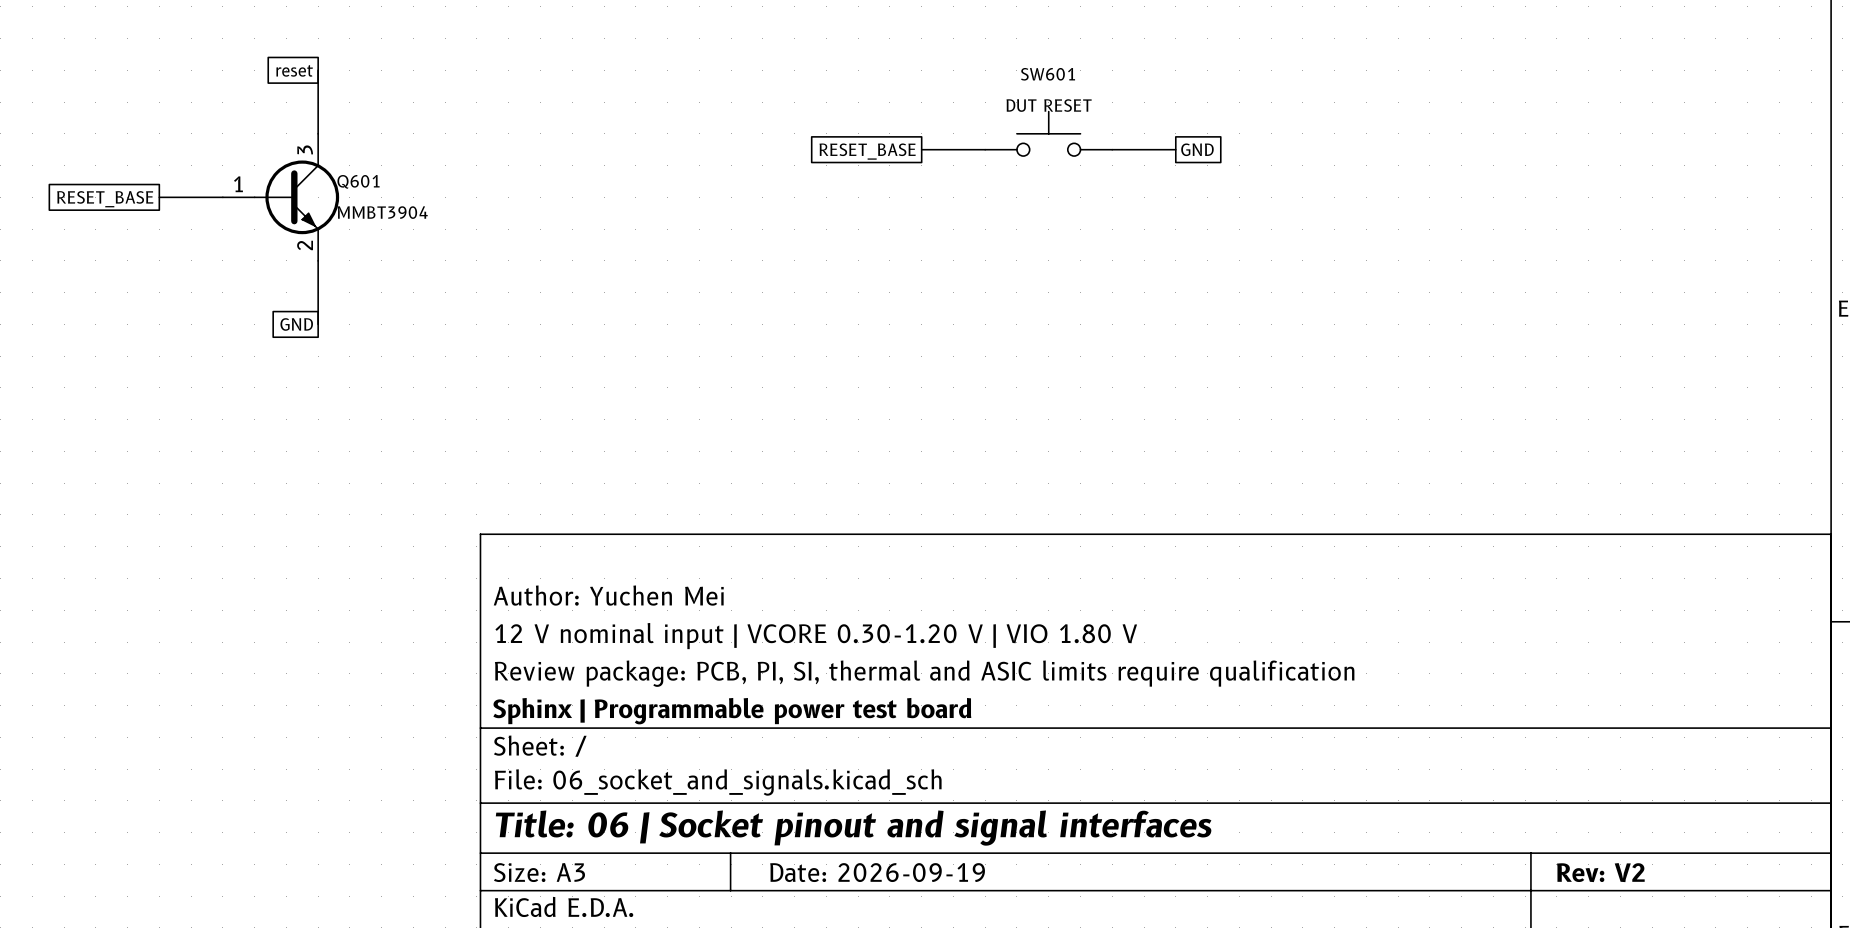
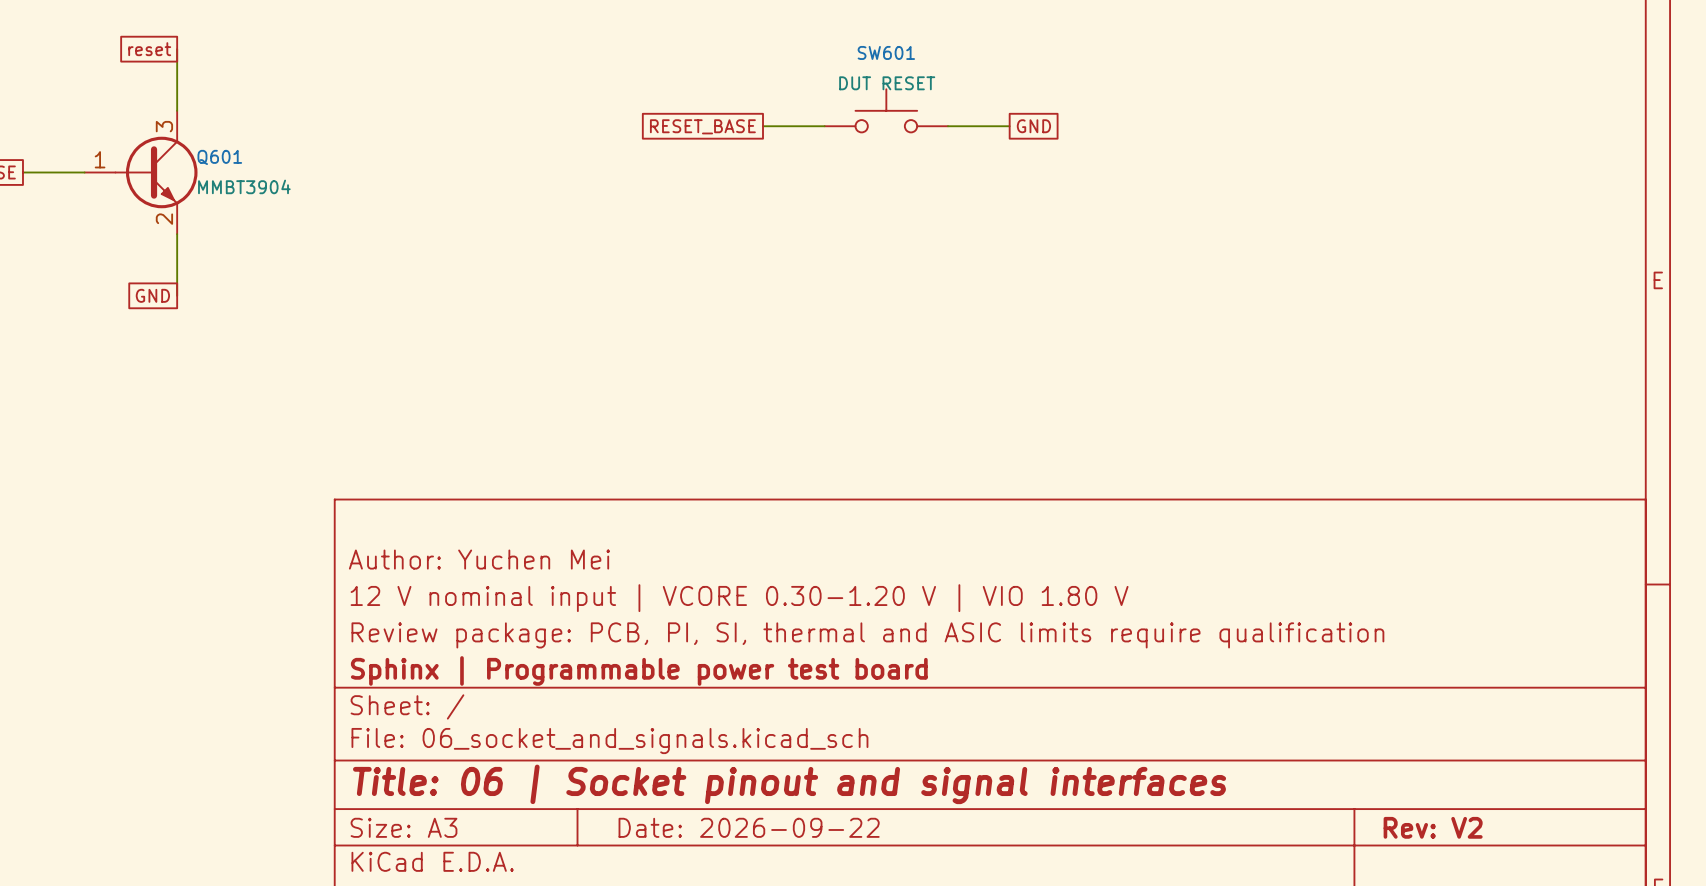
title block: Date: 2026-09-19 (877, 872) -> Date: 2026-09-22 (749, 827)

